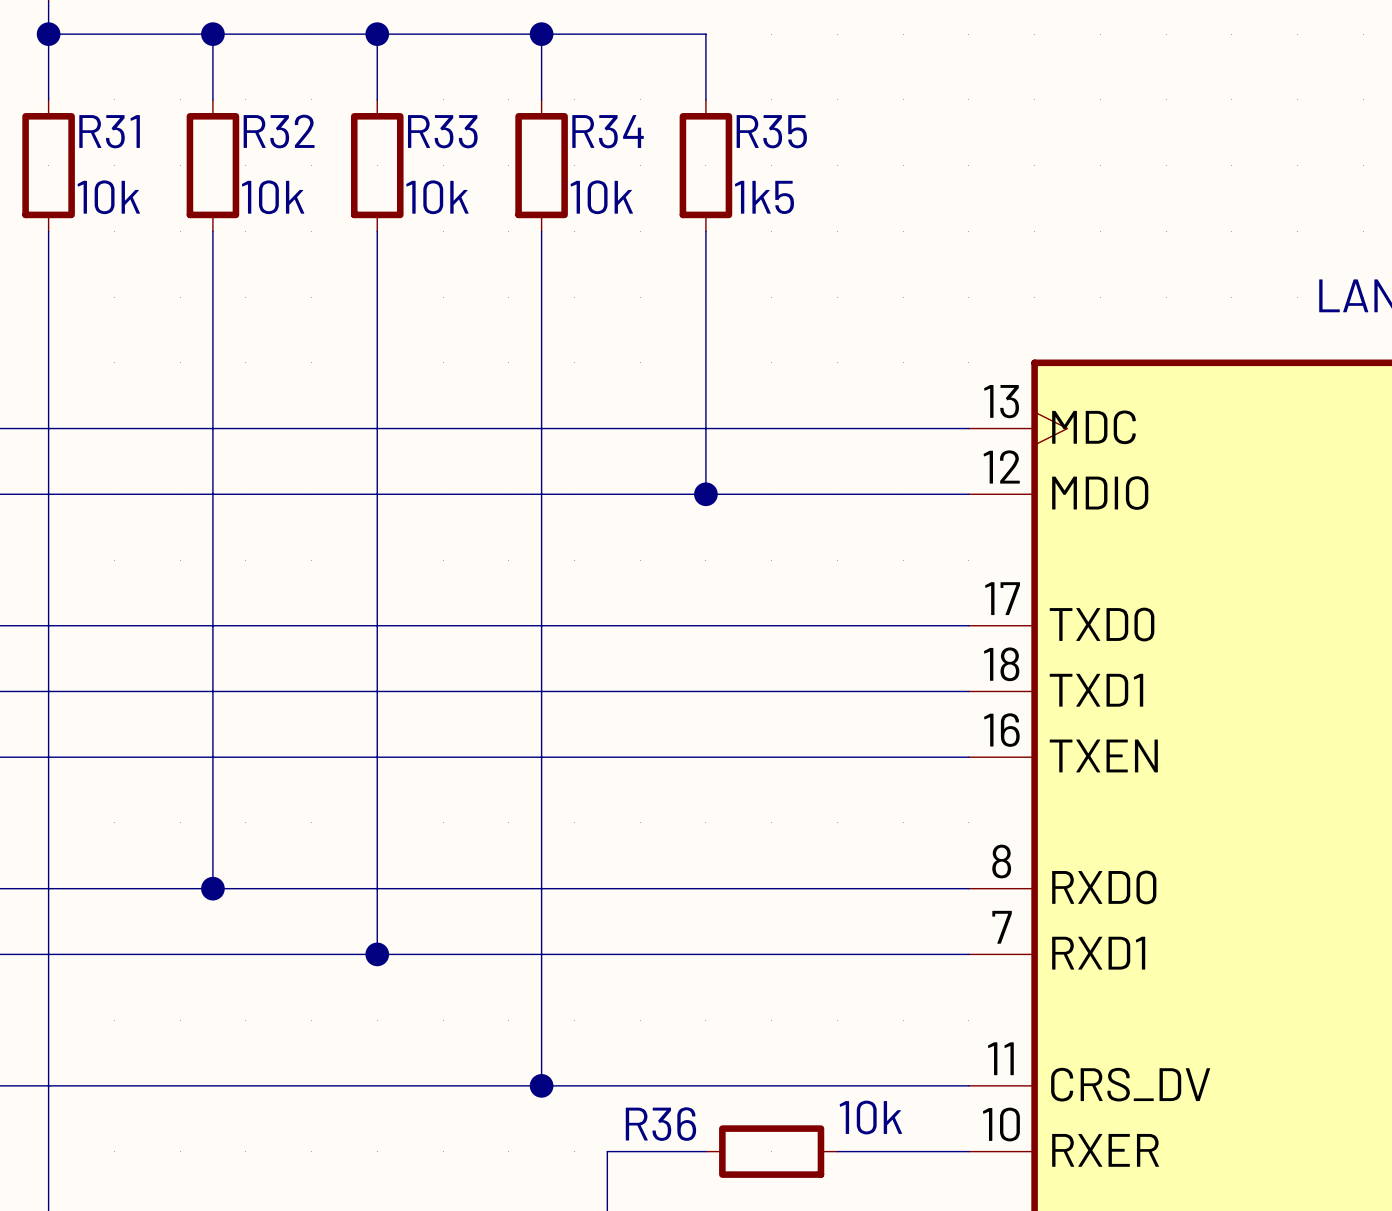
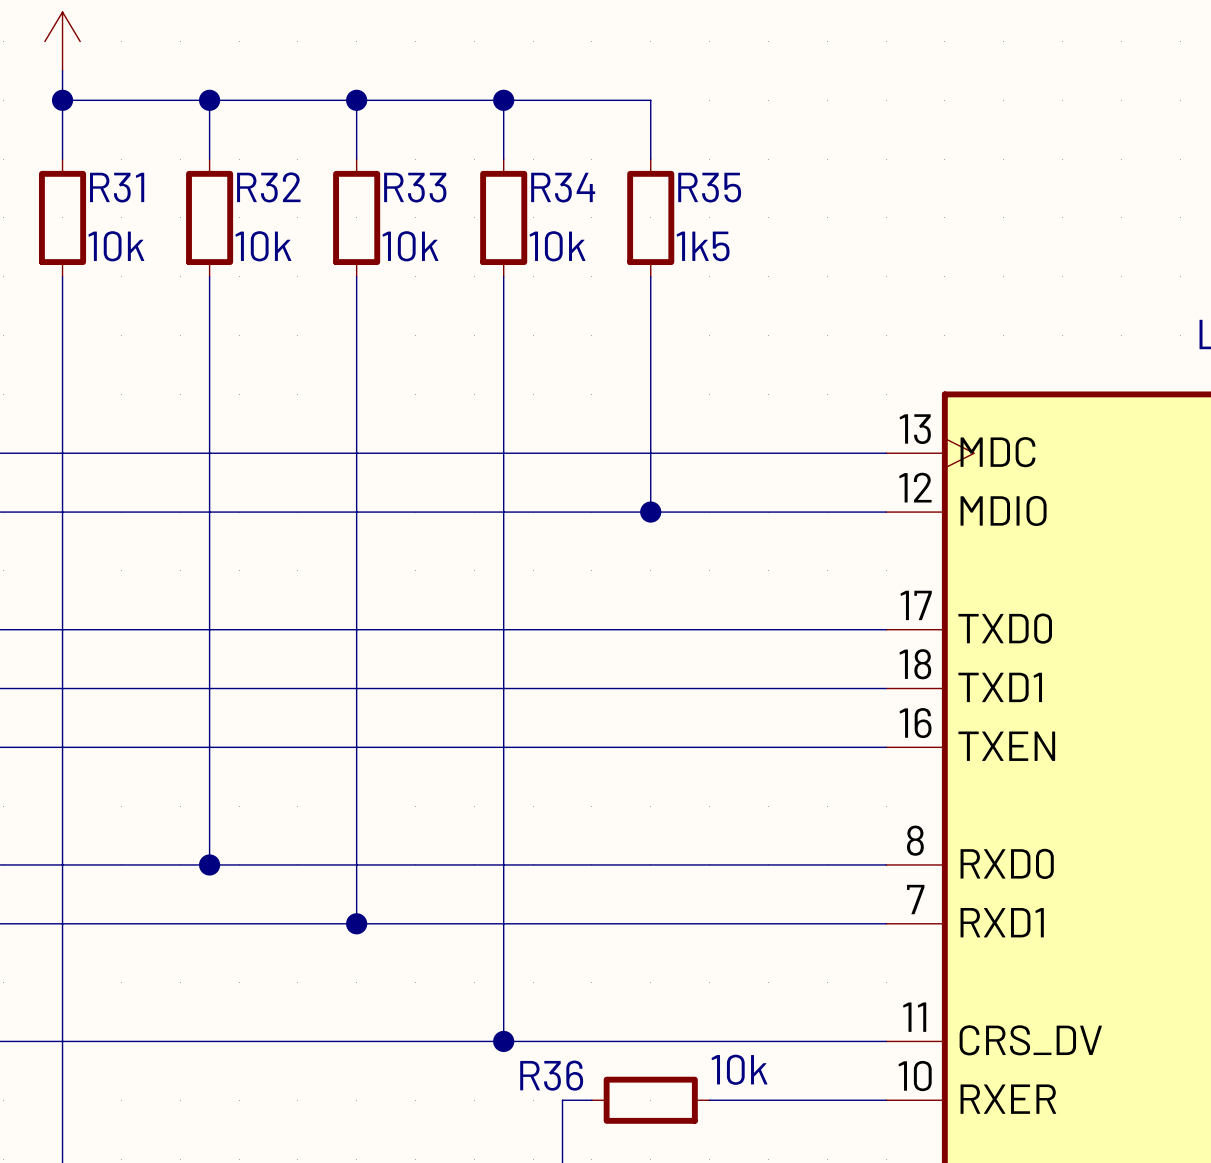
wire: (640, 1151) (705, 1151) -> (709, 1100) (768, 1100)
R36 position: (771, 1151) -> (650, 1100)

